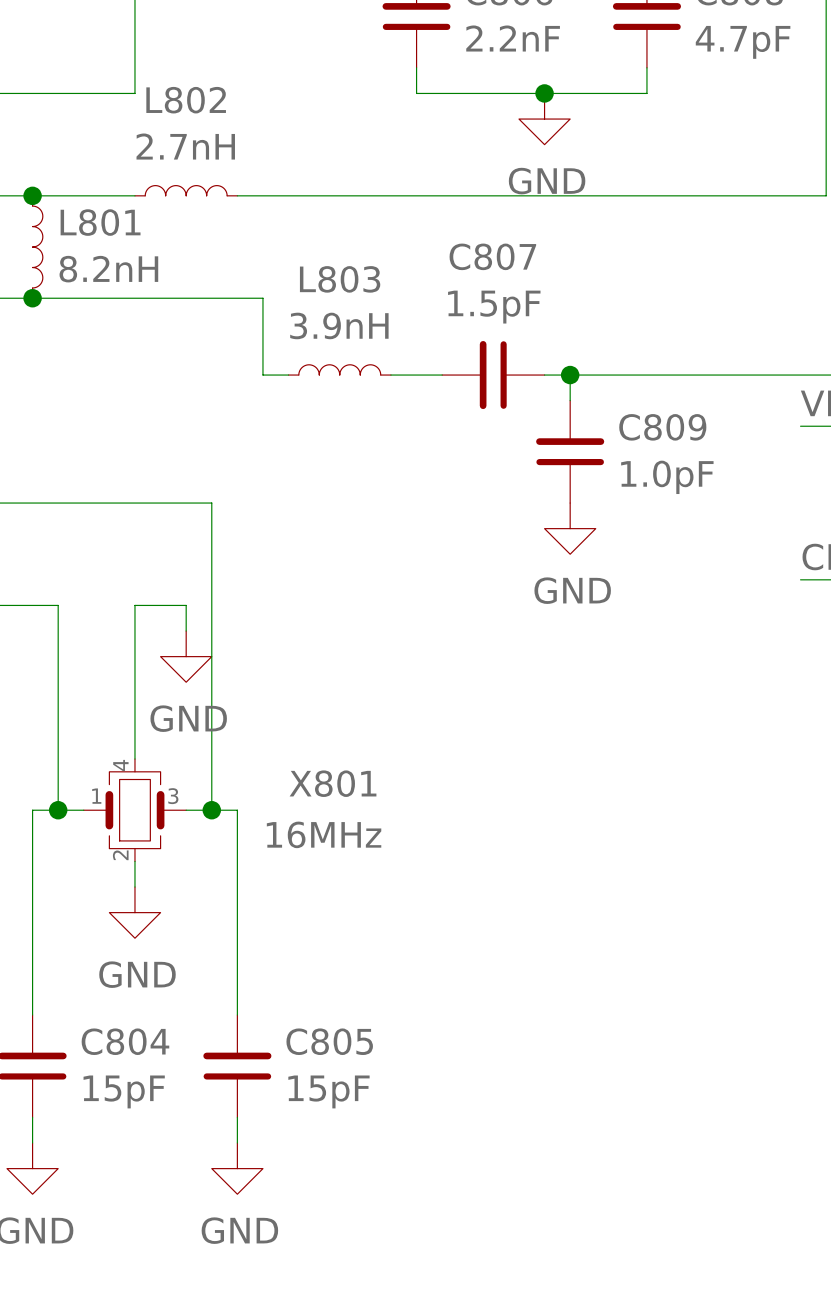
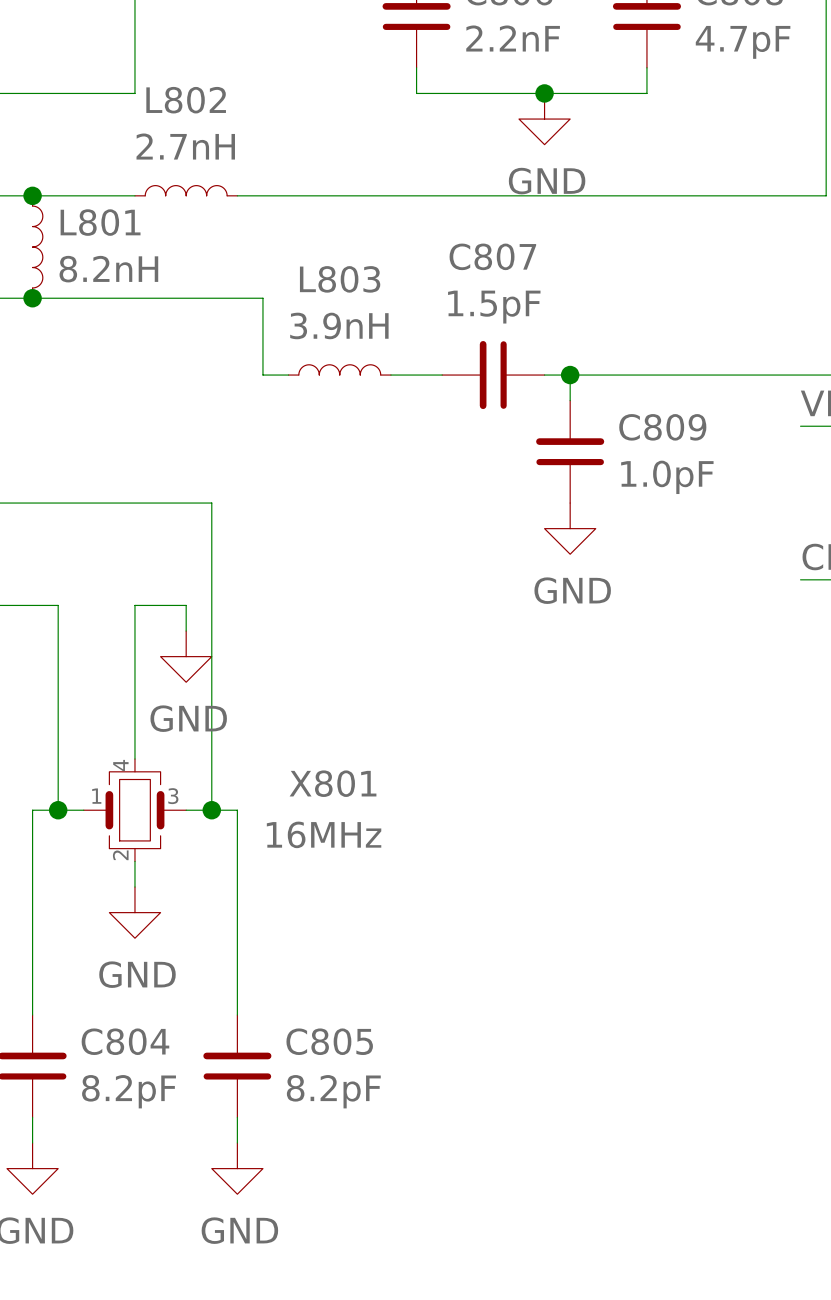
C804 value: 15pF (124, 1091) -> 8.2pF (129, 1091)
C805 value: 15pF (328, 1091) -> 8.2pF (333, 1091)

